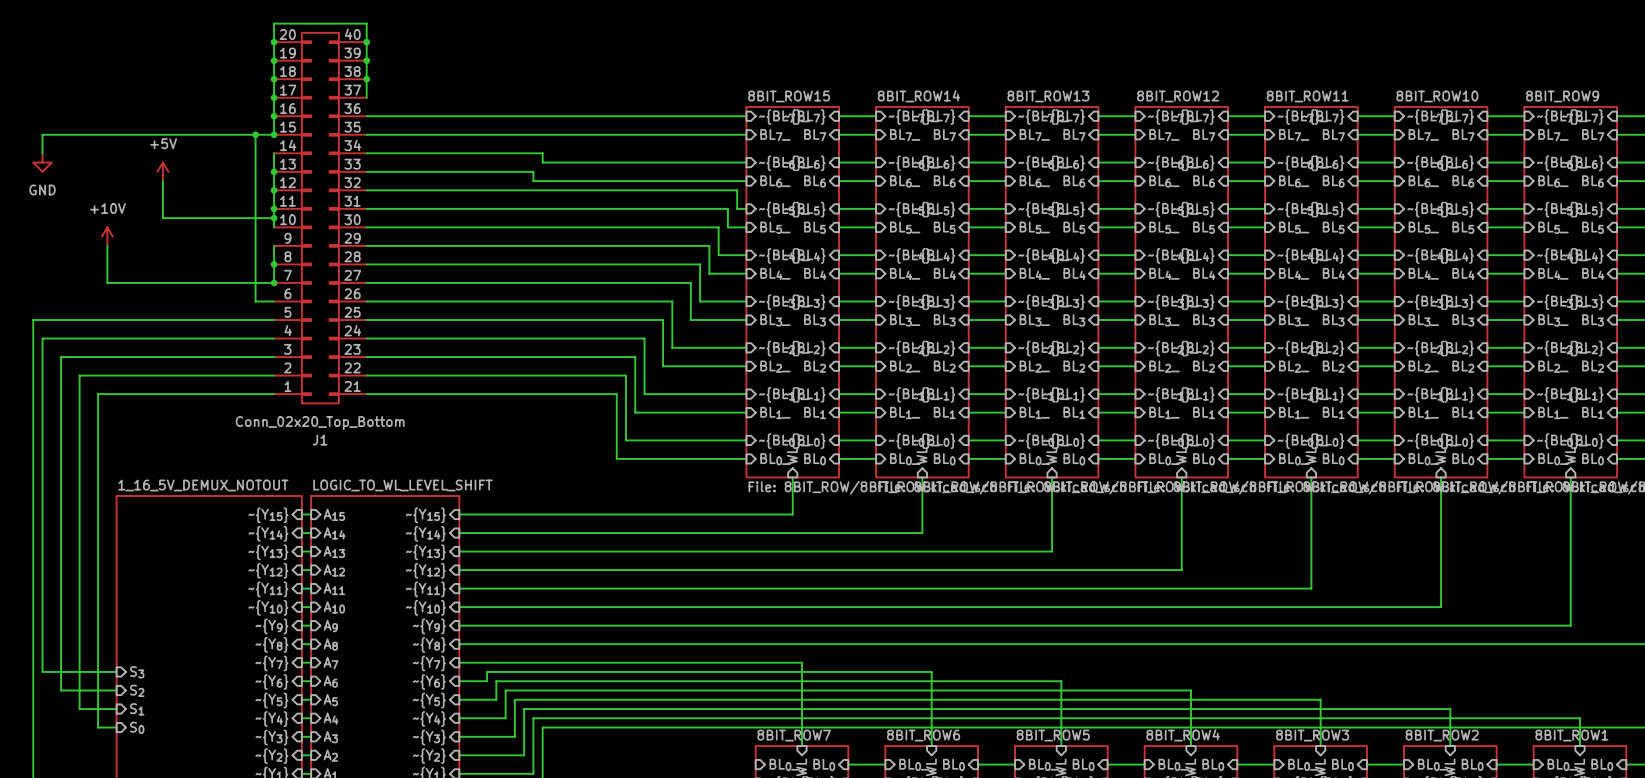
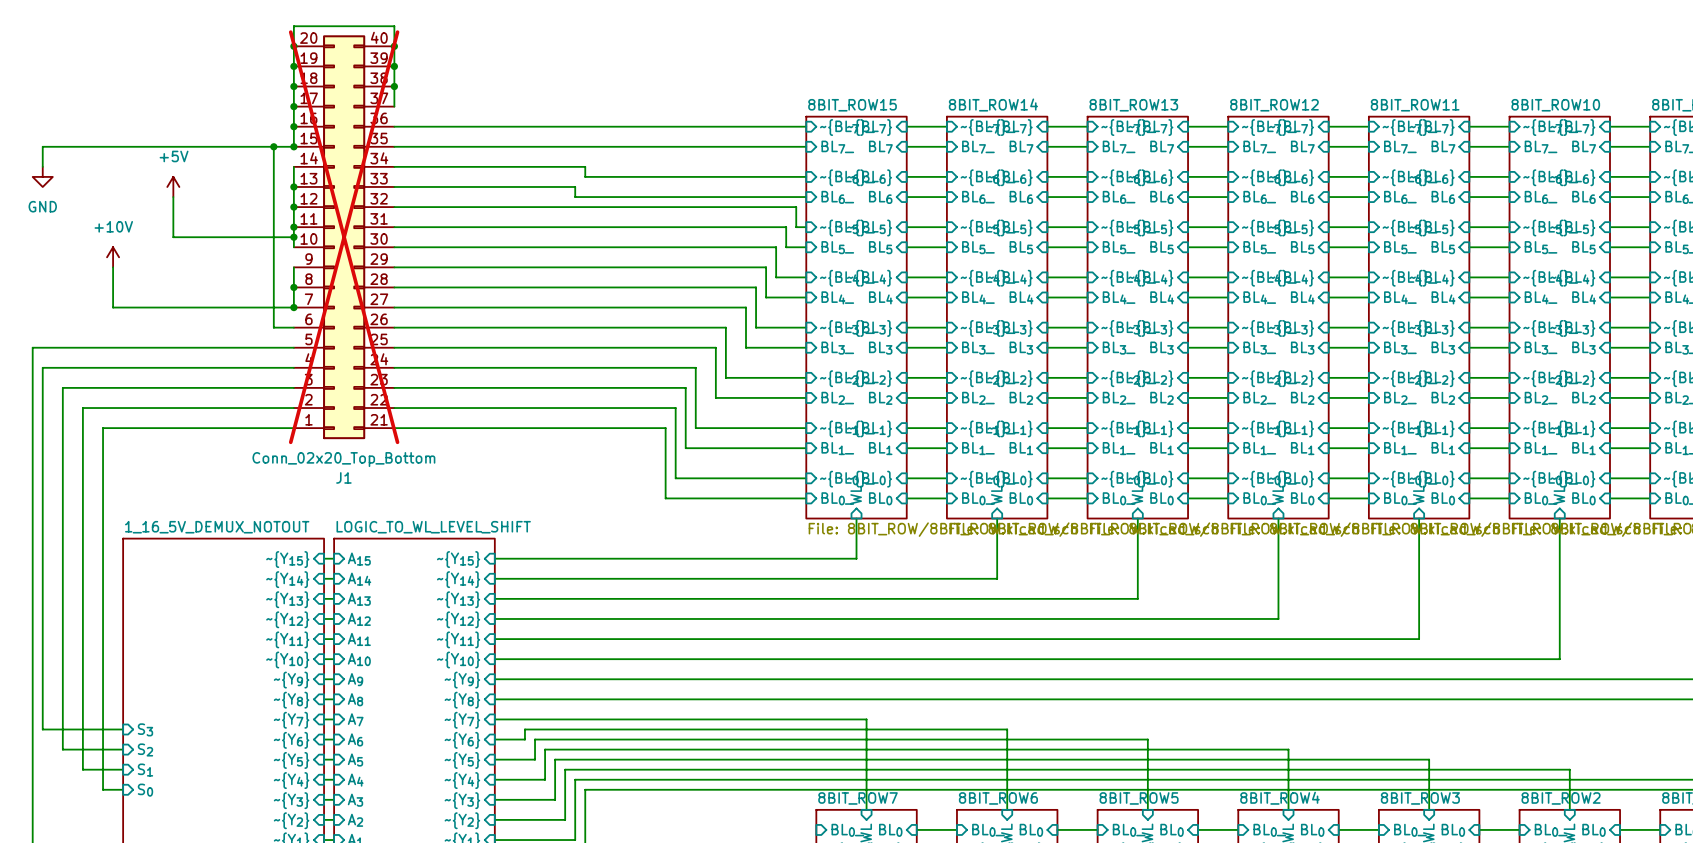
J1 do-not-place cross: none -> (344, 237)

